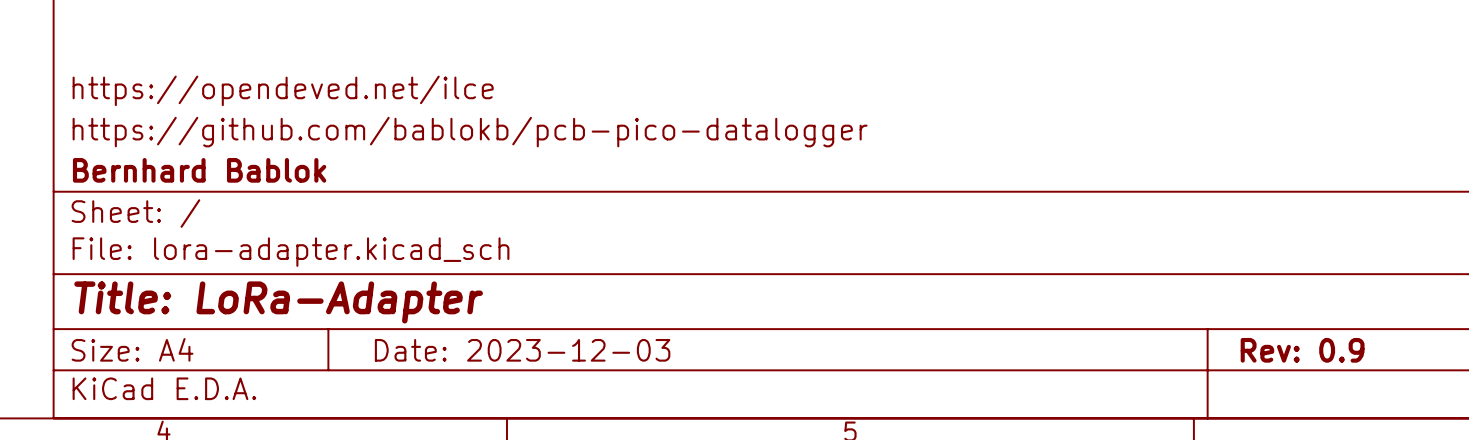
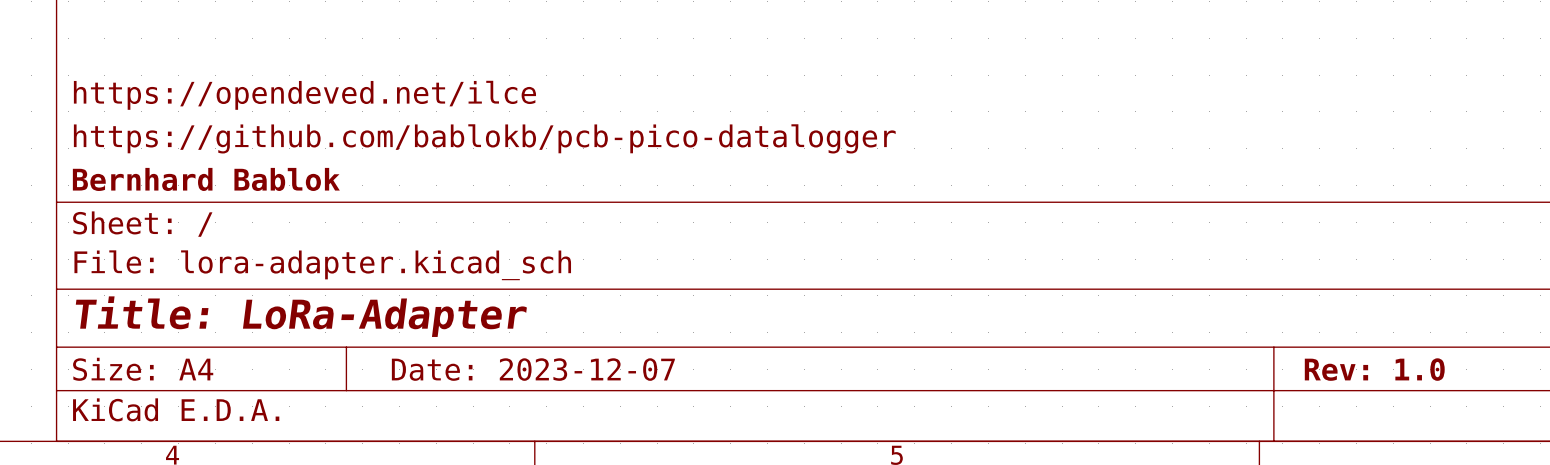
title block: Date: 2023-12-03 (522, 350) -> Date: 2023-12-07 (533, 369)
title block: Rev: 0.9 (1302, 350) -> Rev: 1.0 (1374, 369)

